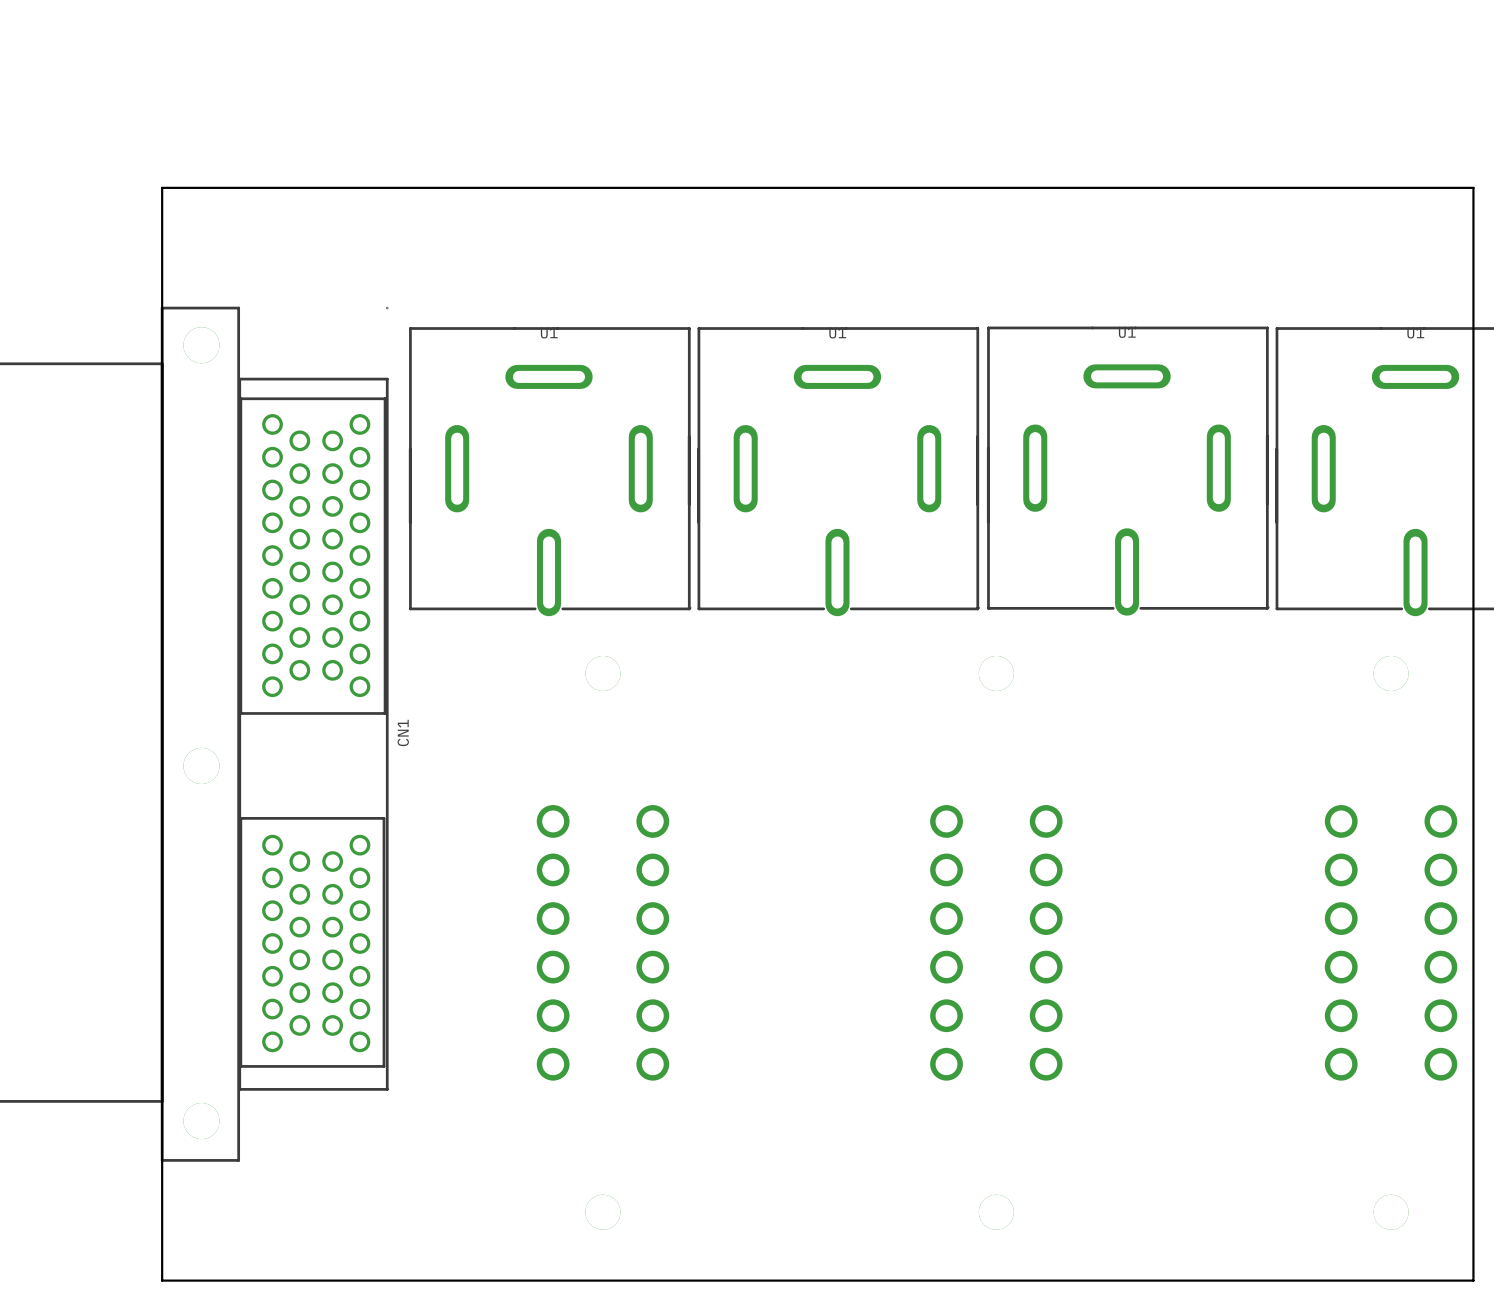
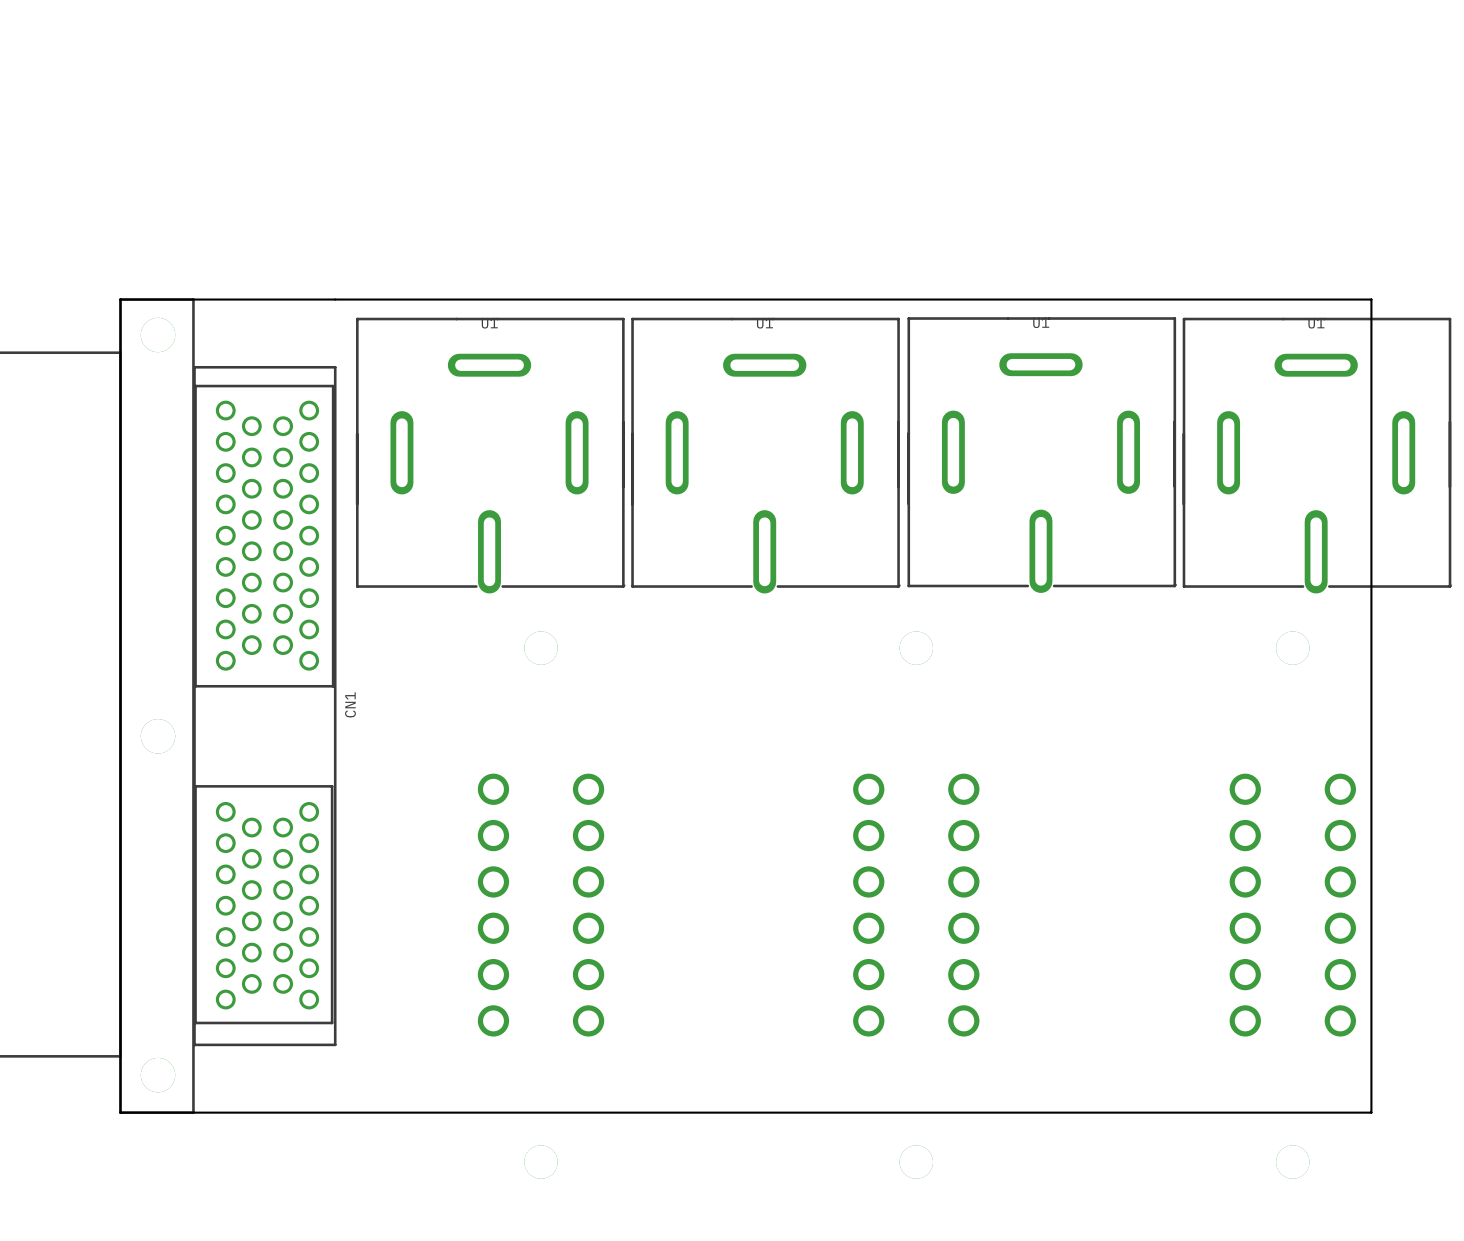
board edge: (162, 308) (162, 187) (1473, 187) (1473, 308) -> (120, 299) (1371, 299)
board edge: (162, 1160) (162, 1280) (1473, 1280) (1473, 1160) -> (120, 1112) (1371, 1112)

